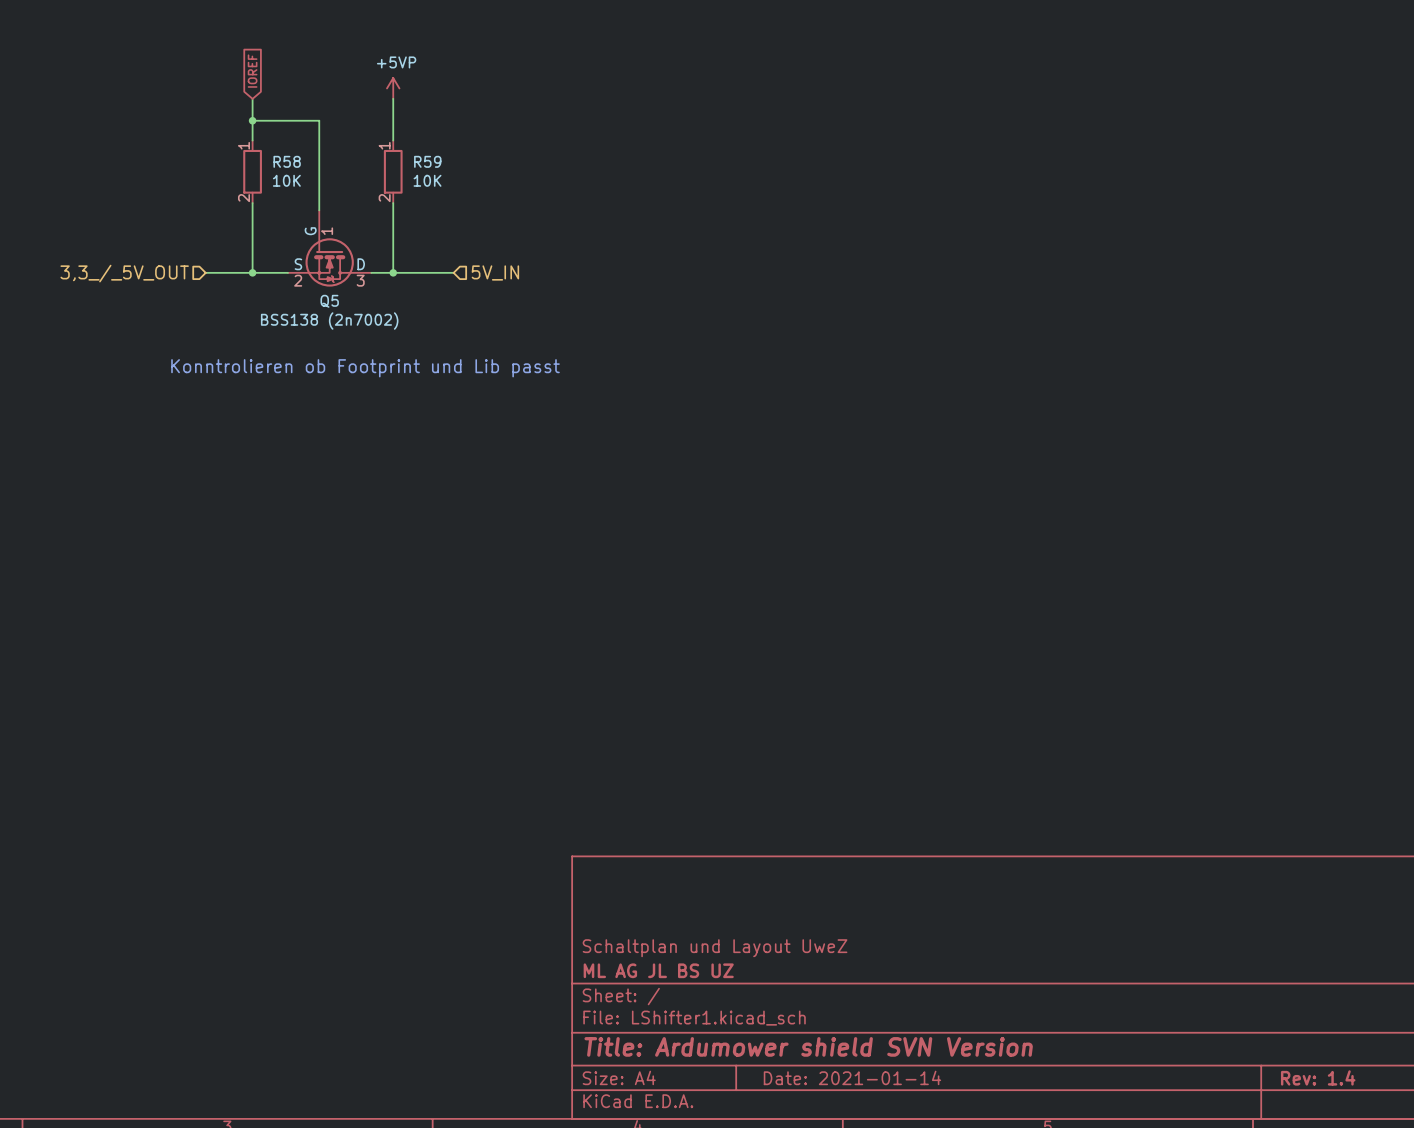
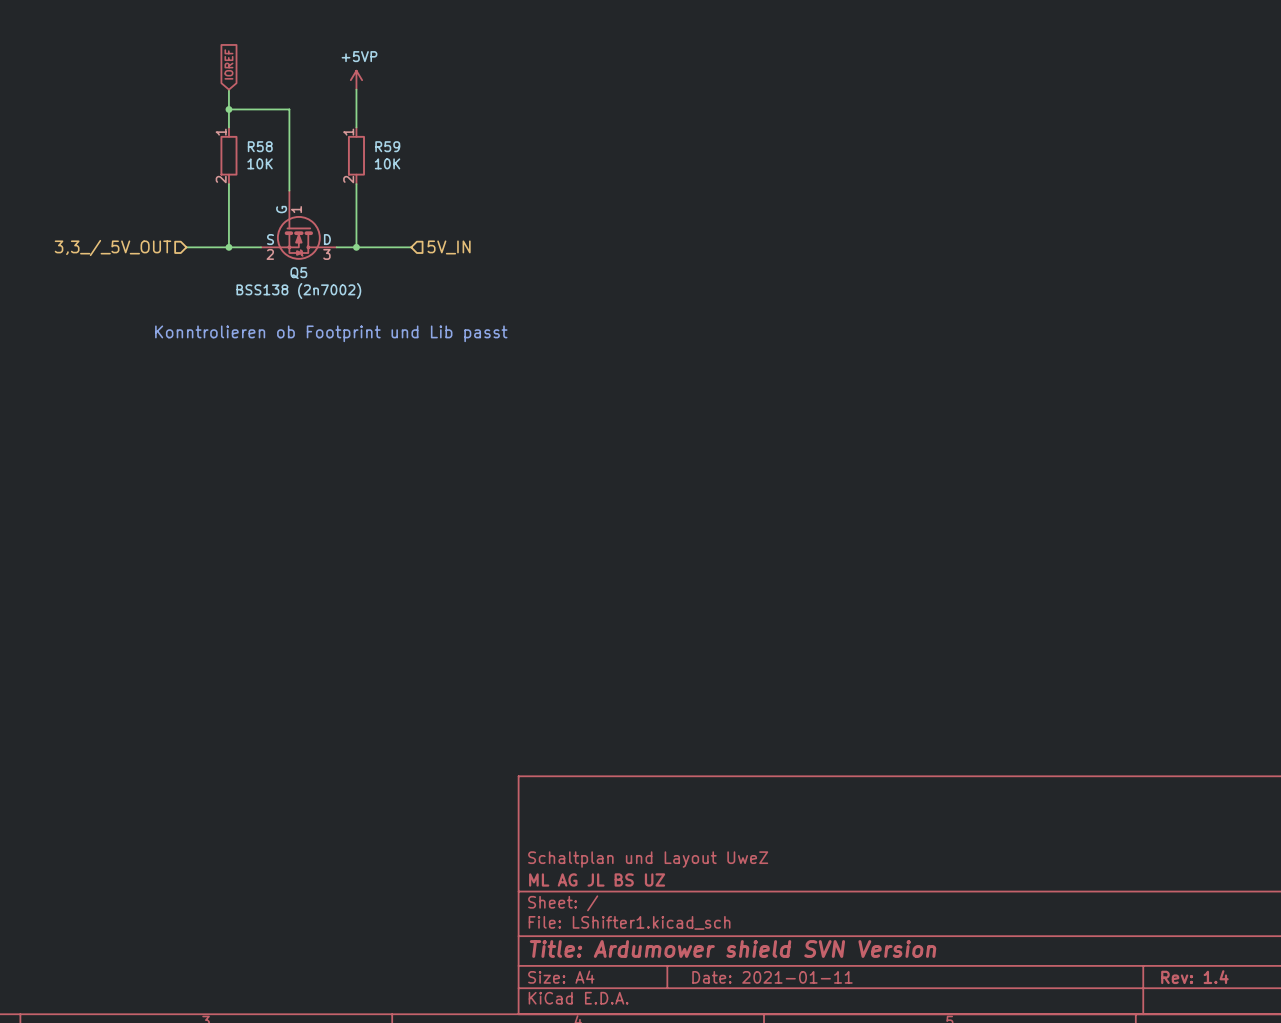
title block: Date: 2021-01-14 (852, 1077) -> Date: 2021-01-11 (772, 977)

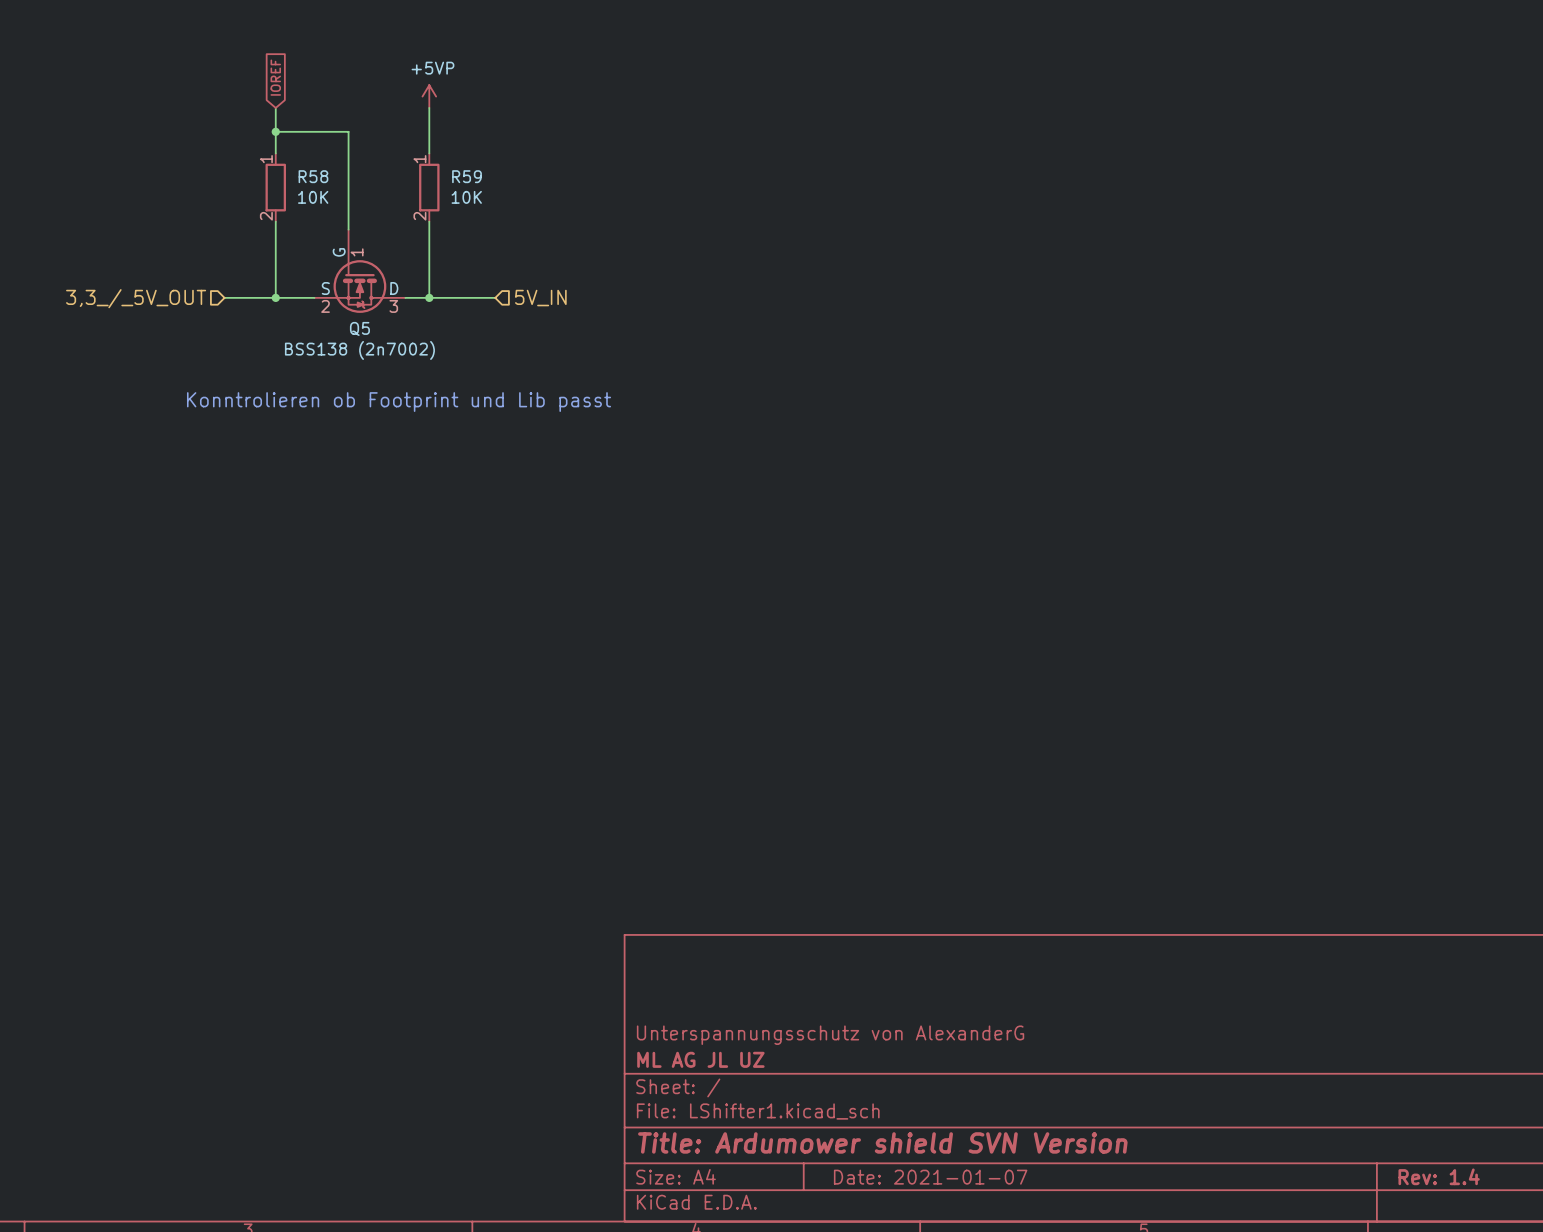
title block: Schaltplan und Layout UweZ (648, 859) -> Unterspannungsschutz von AlexanderG (830, 1035)
title block: ML AG JL BS UZ (597, 879) -> ML AG JL UZ (700, 1059)
title block: Date: 2021-01-11 (772, 977) -> Date: 2021-01-07 (930, 1177)

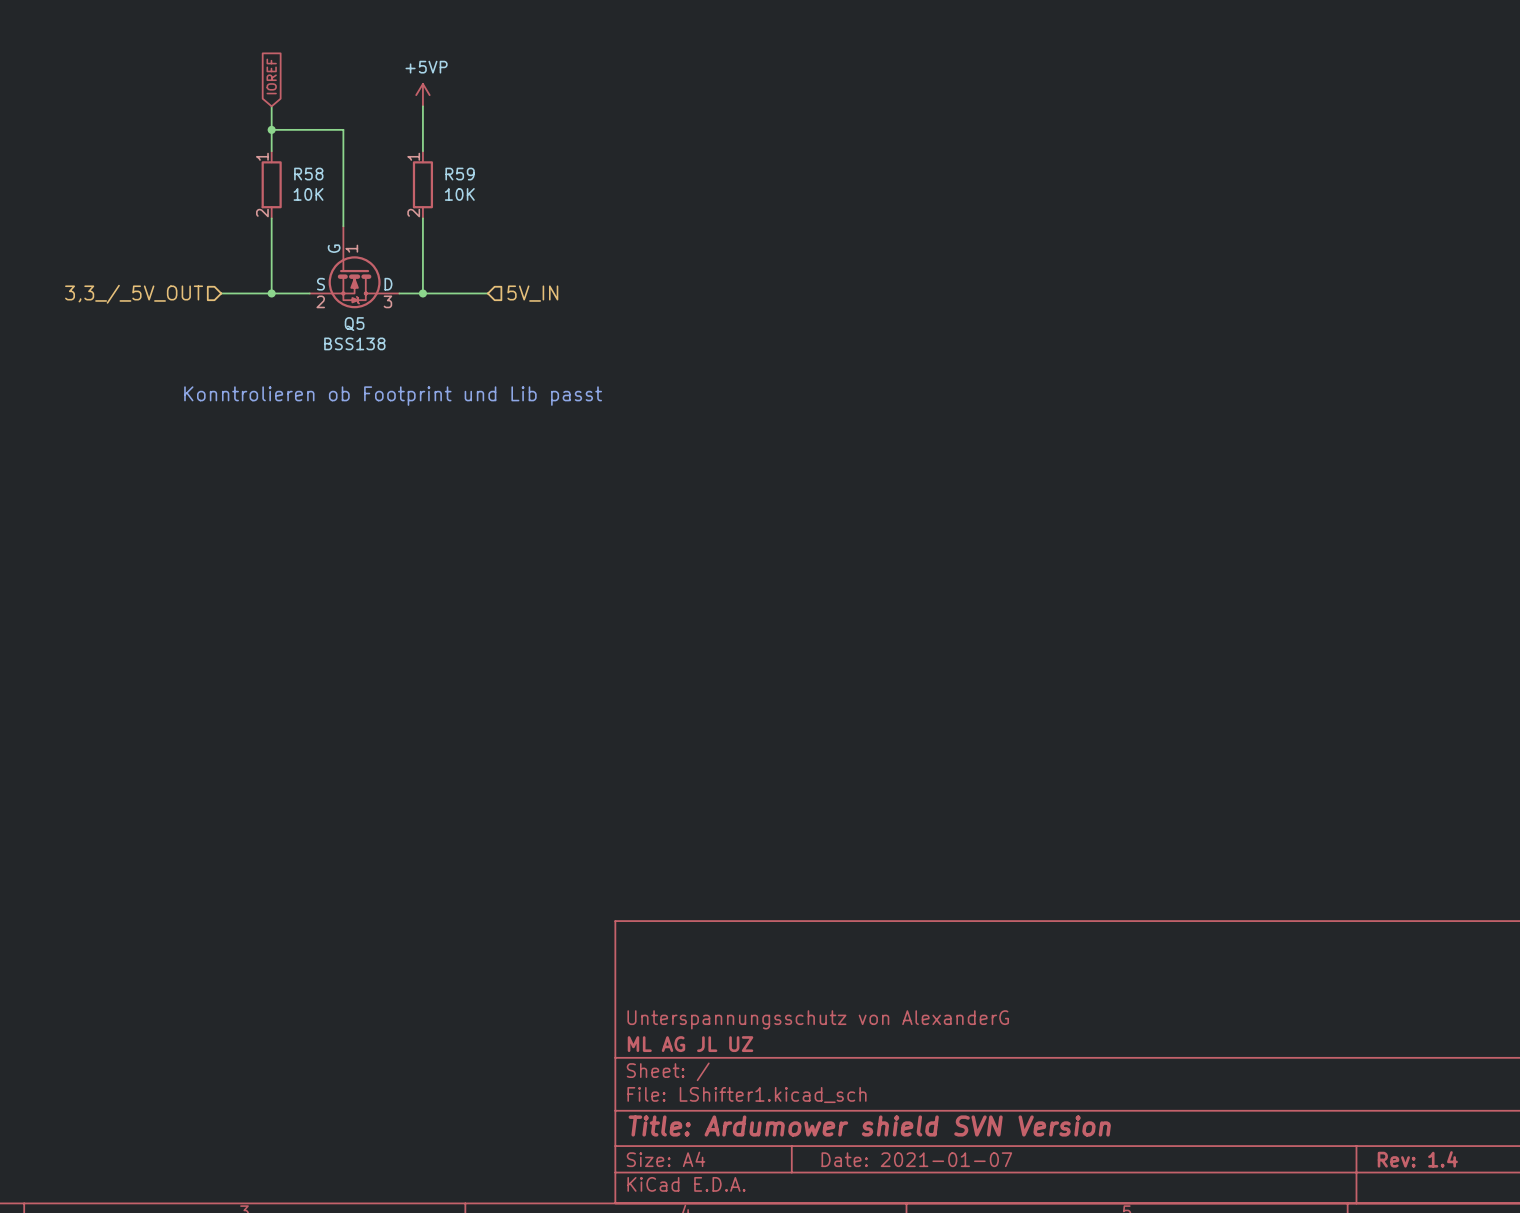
Q5 value: BSS138 (2n7002) (359, 350) -> BSS138 (354, 343)

